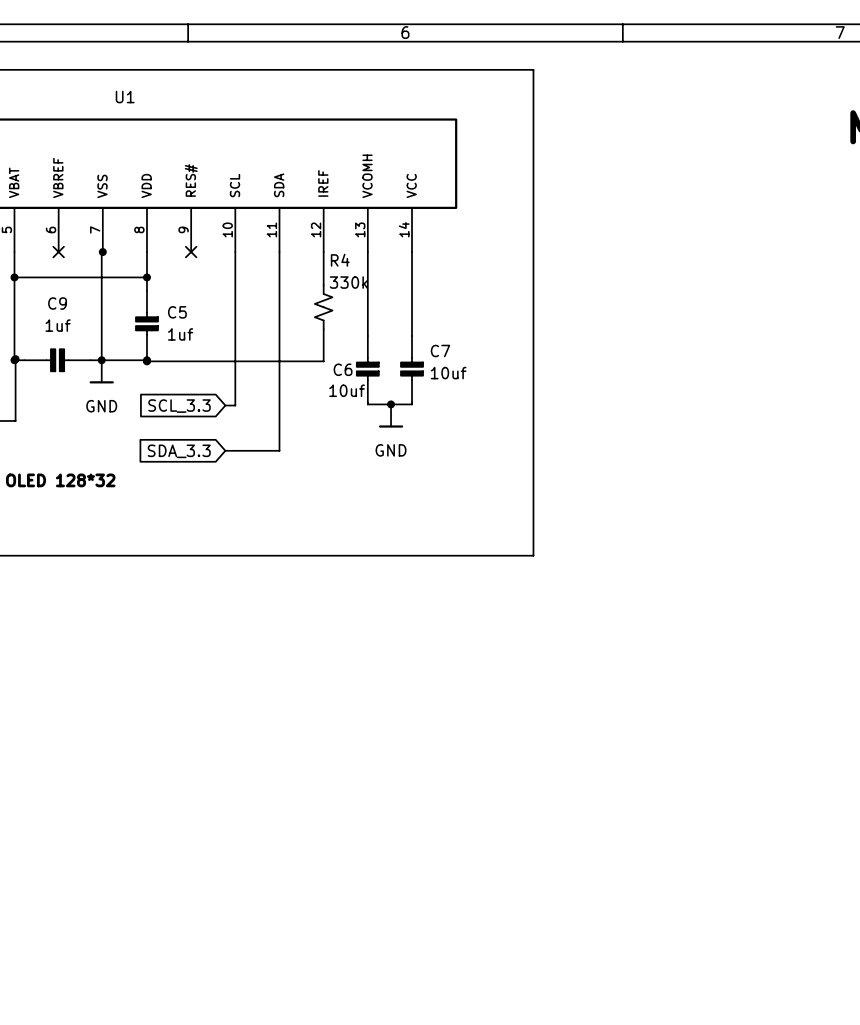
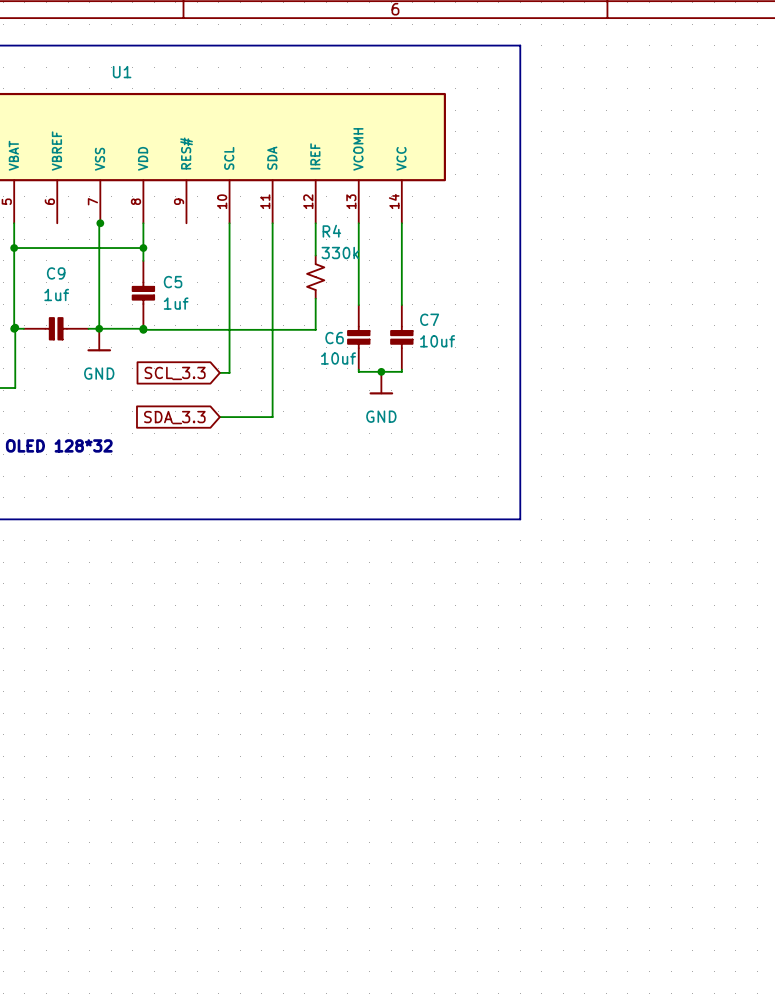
no-connect mark: (58, 252) -> none
no-connect mark: (191, 252) -> none

